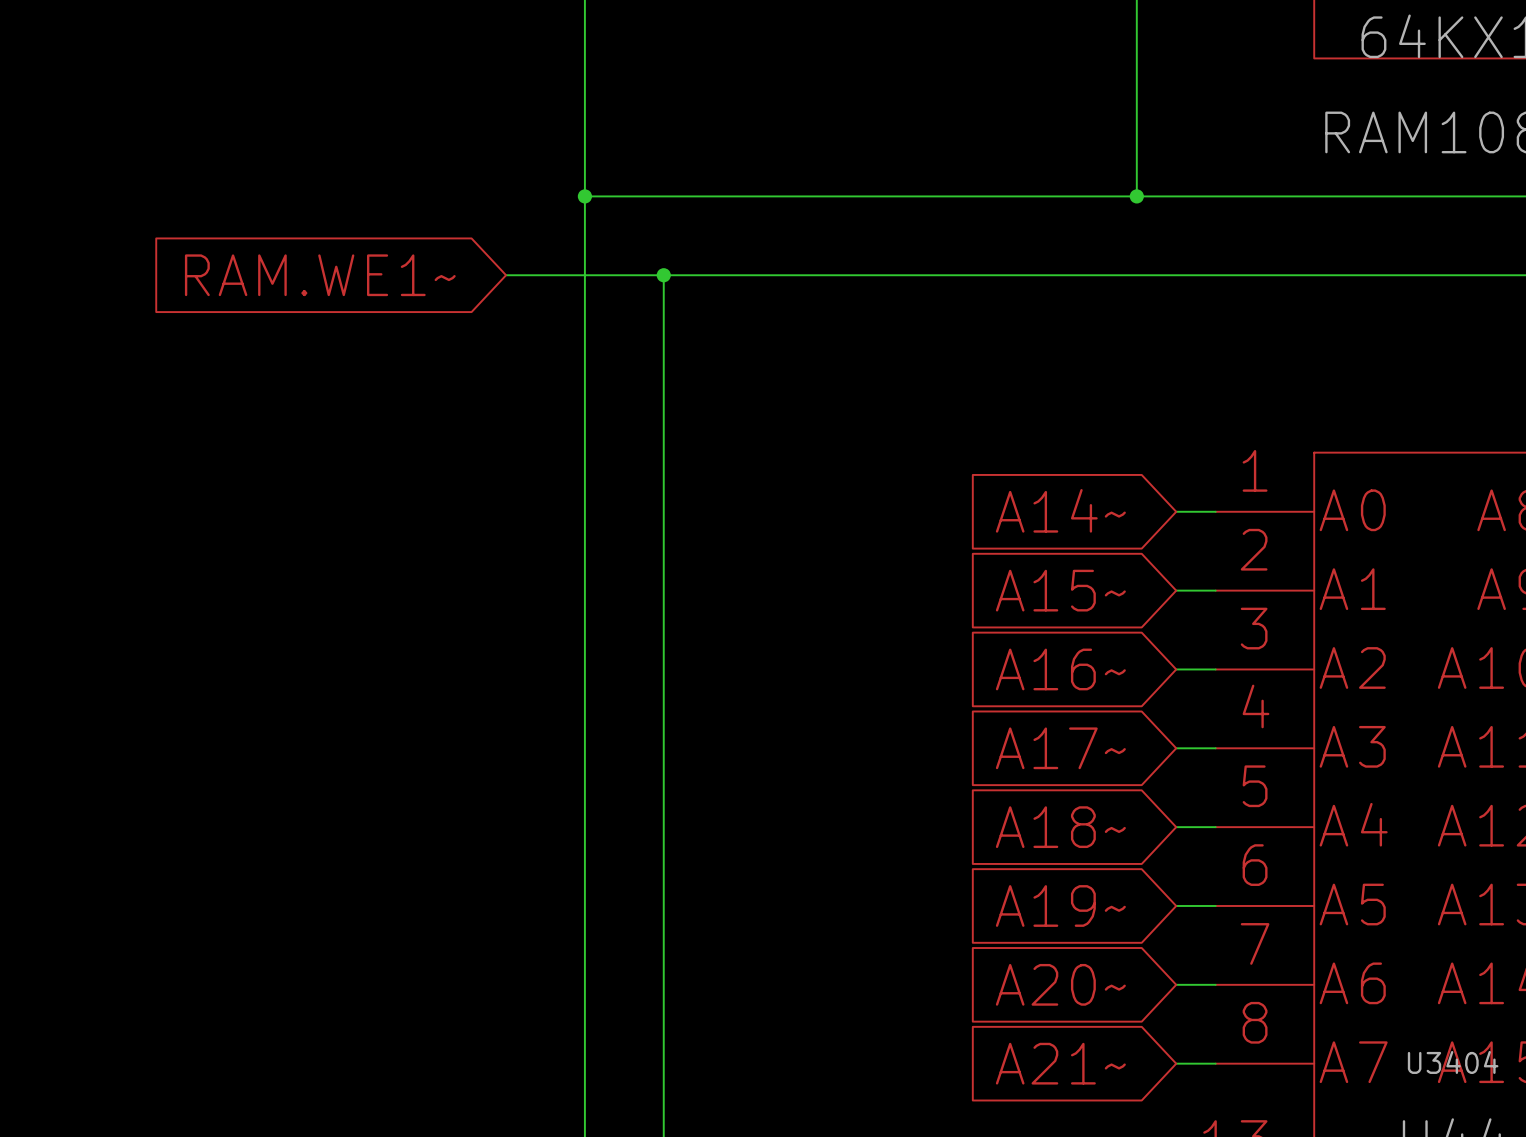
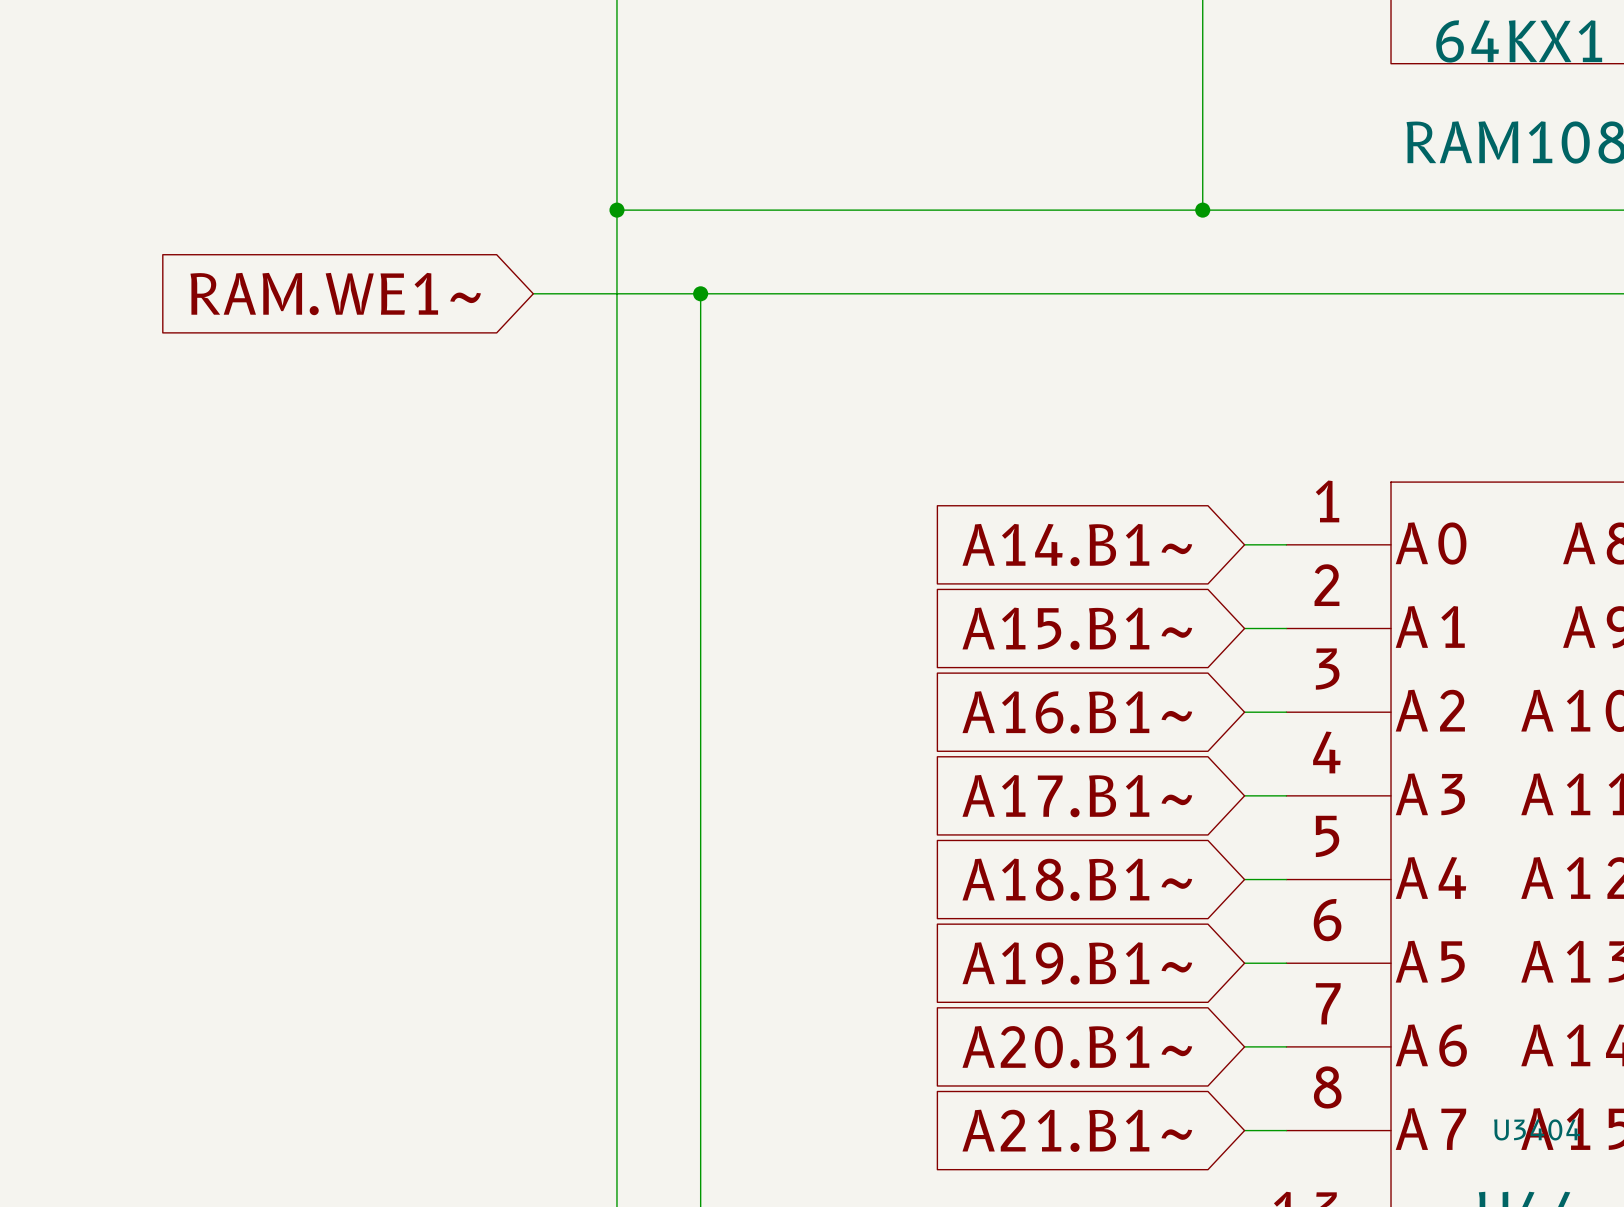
global label: A14~ (1060, 510) -> A14.B1~ (1077, 545)
global label: A15~ (1060, 590) -> A15.B1~ (1077, 628)
global label: A16~ (1060, 669) -> A16.B1~ (1077, 712)
global label: A17~ (1060, 748) -> A17.B1~ (1077, 796)
global label: A18~ (1060, 827) -> A18.B1~ (1077, 879)
global label: A19~ (1060, 905) -> A19.B1~ (1077, 963)
global label: A20~ (1060, 984) -> A20.B1~ (1077, 1047)
global label: A21~ (1060, 1063) -> A21.B1~ (1077, 1130)

